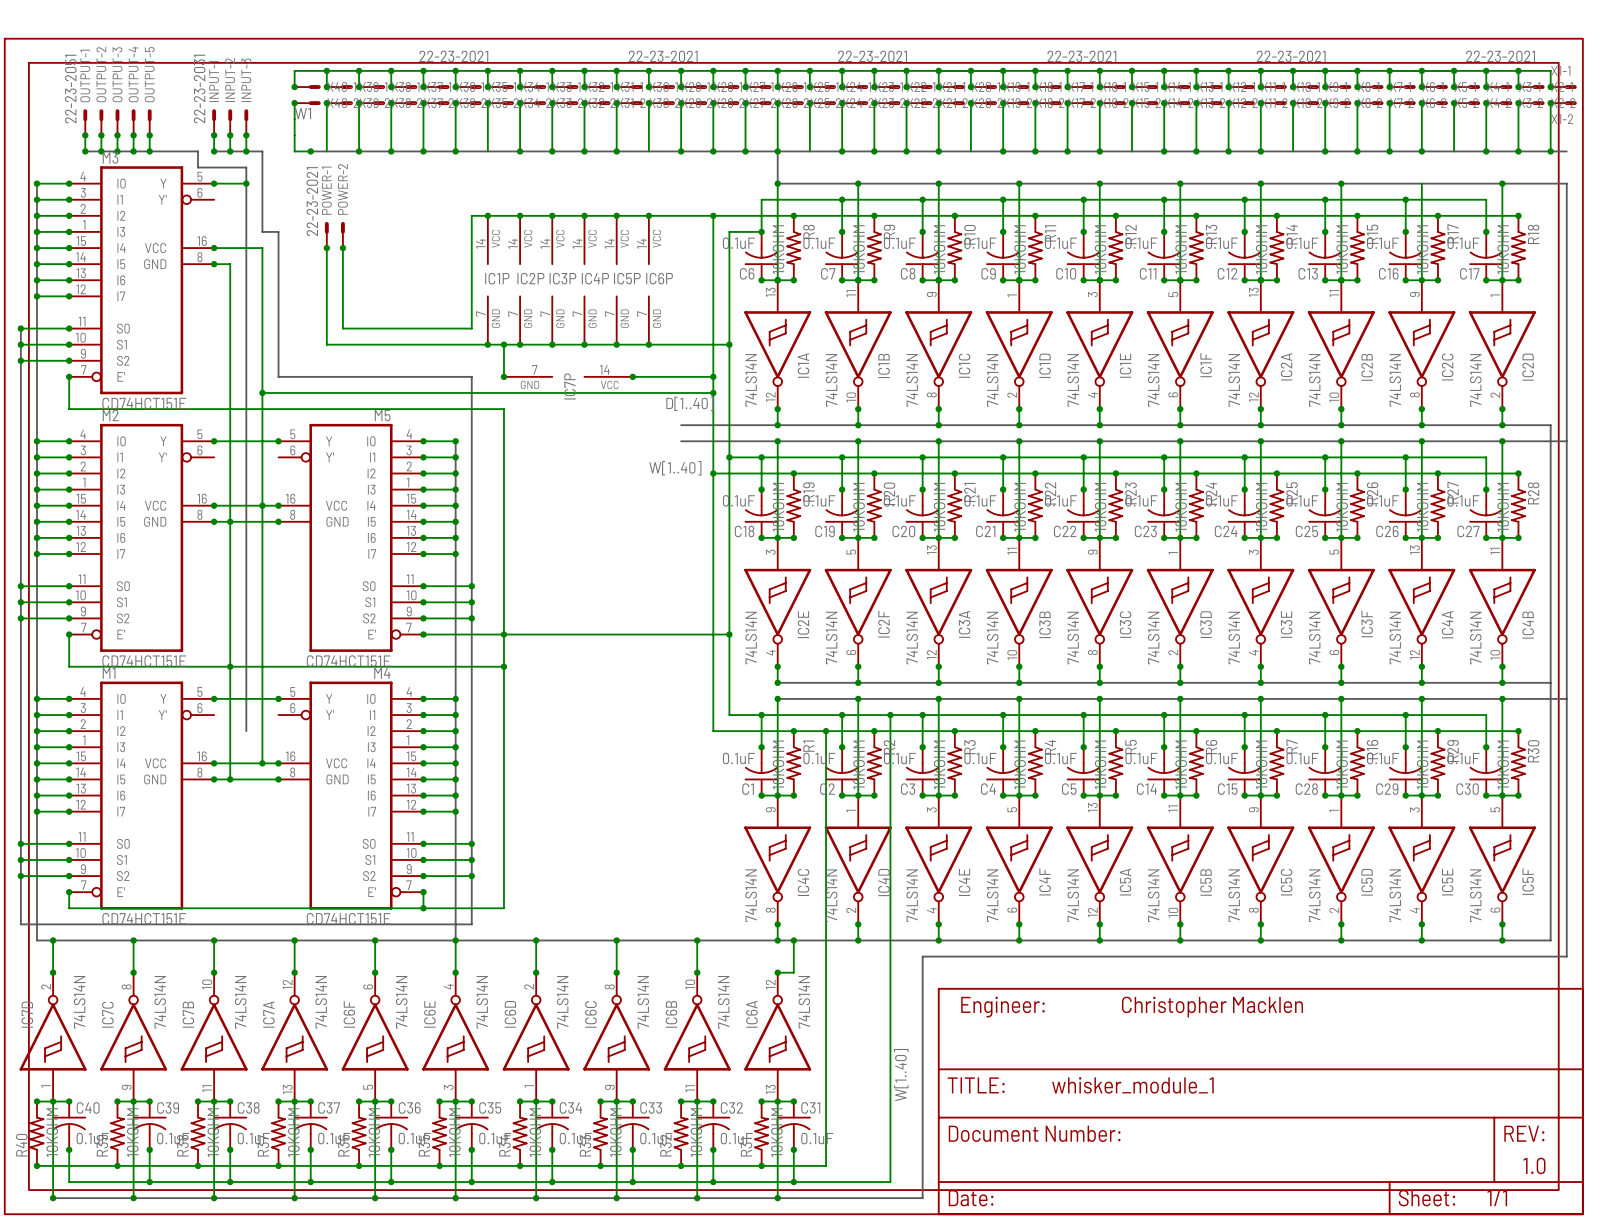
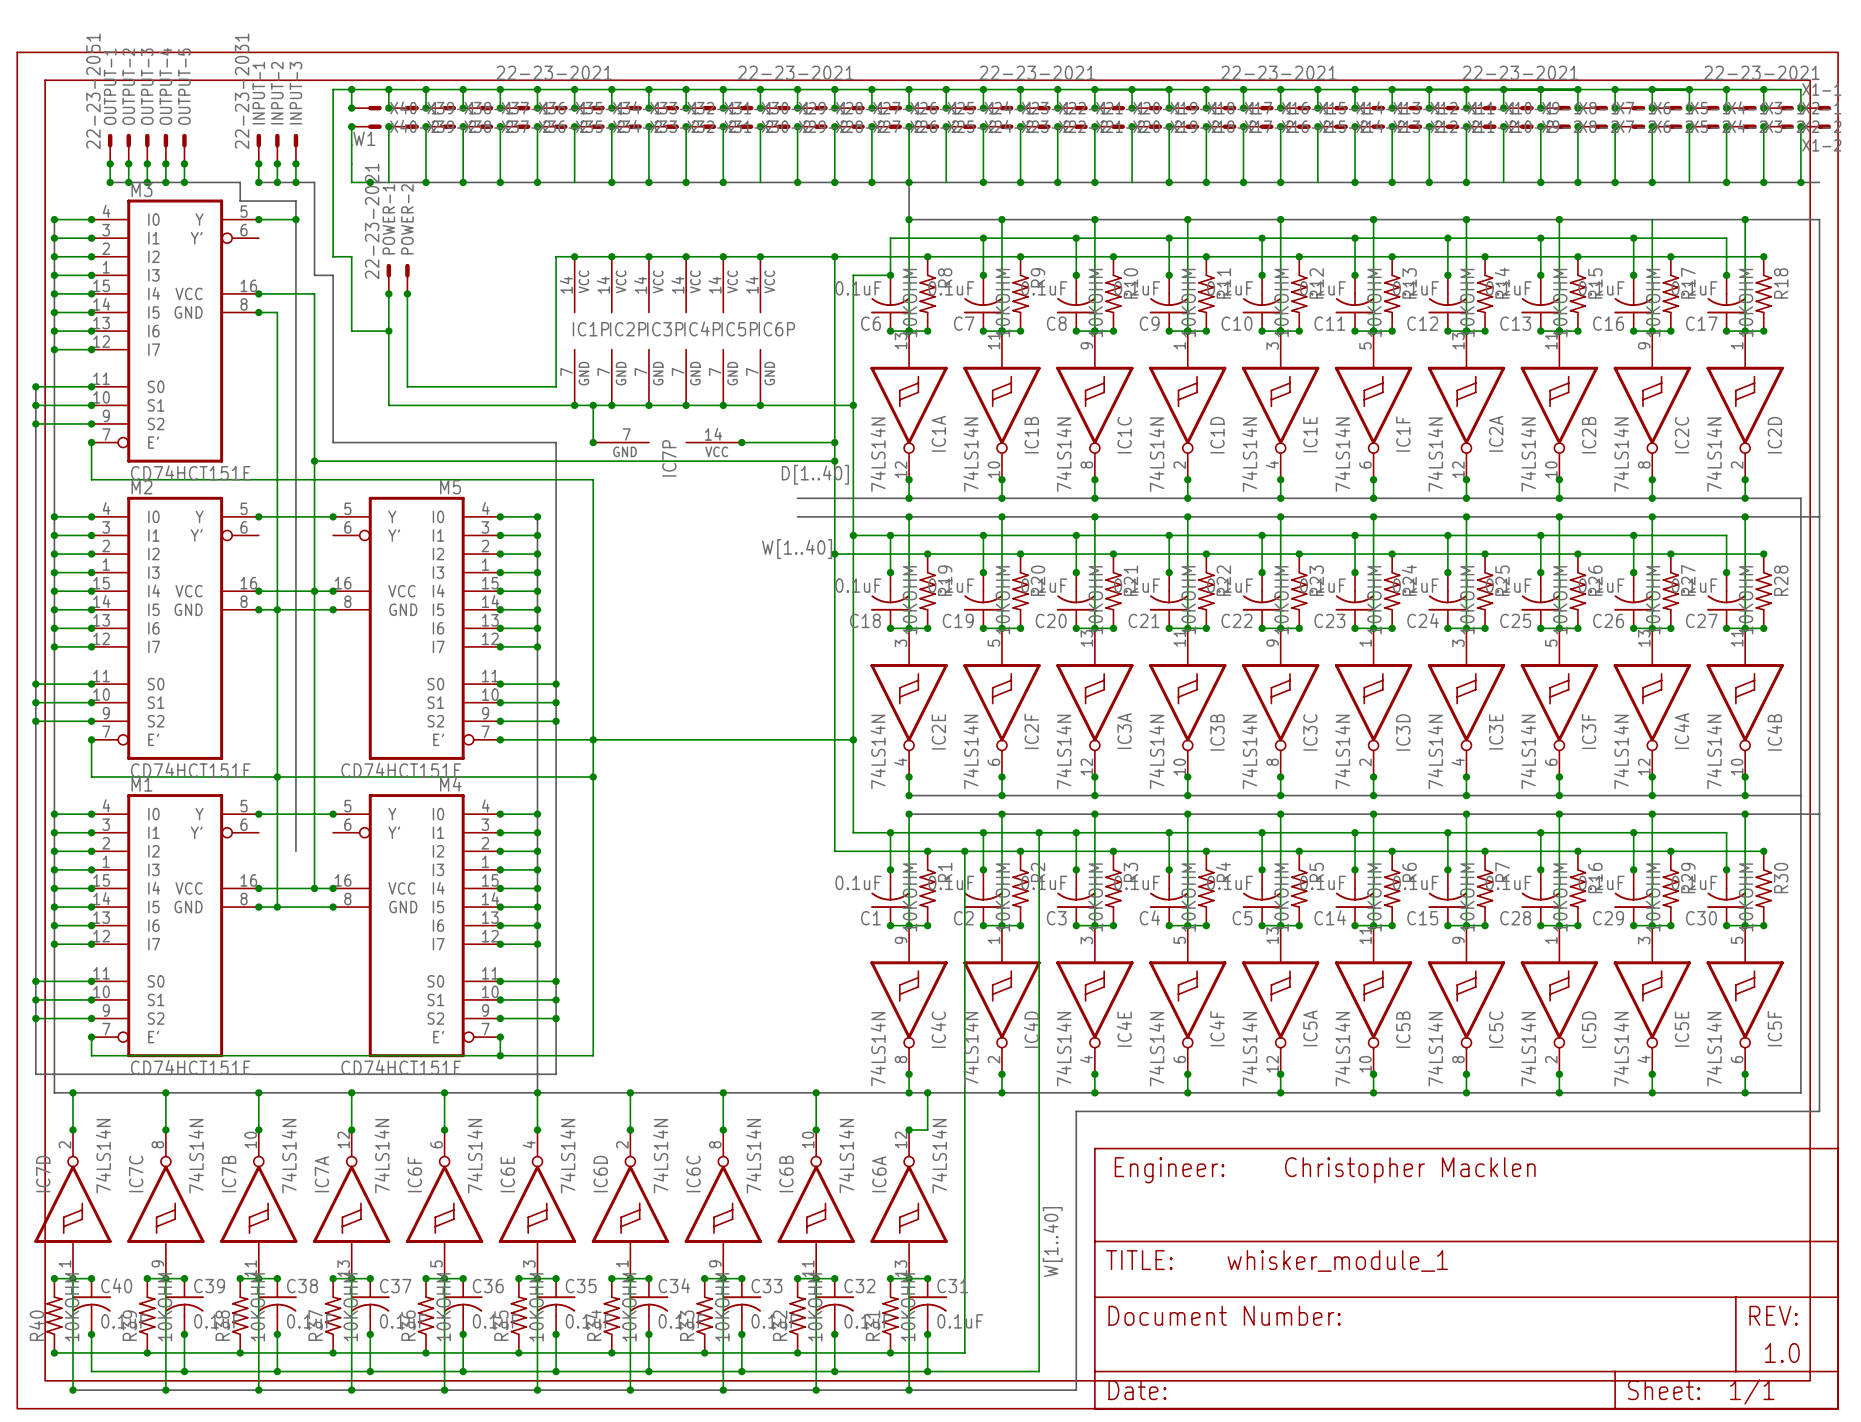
wire: none -> (351, 89) (333, 89) (333, 256) (351, 256) (351, 331) (388, 331)
junction: none -> (351, 89)
junction: none -> (388, 331)

